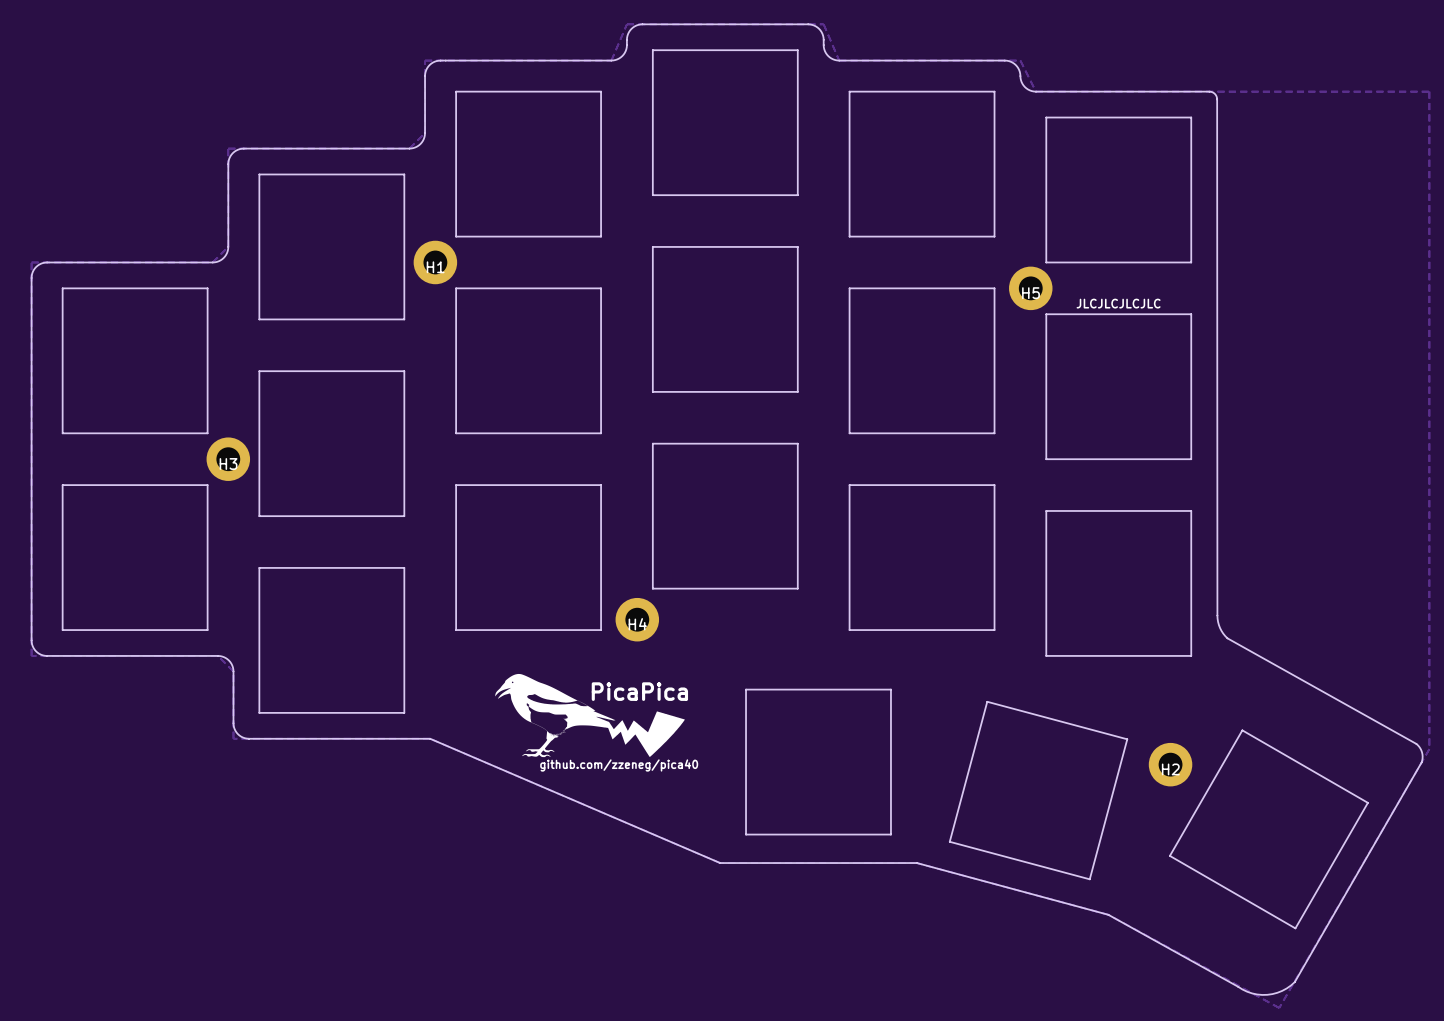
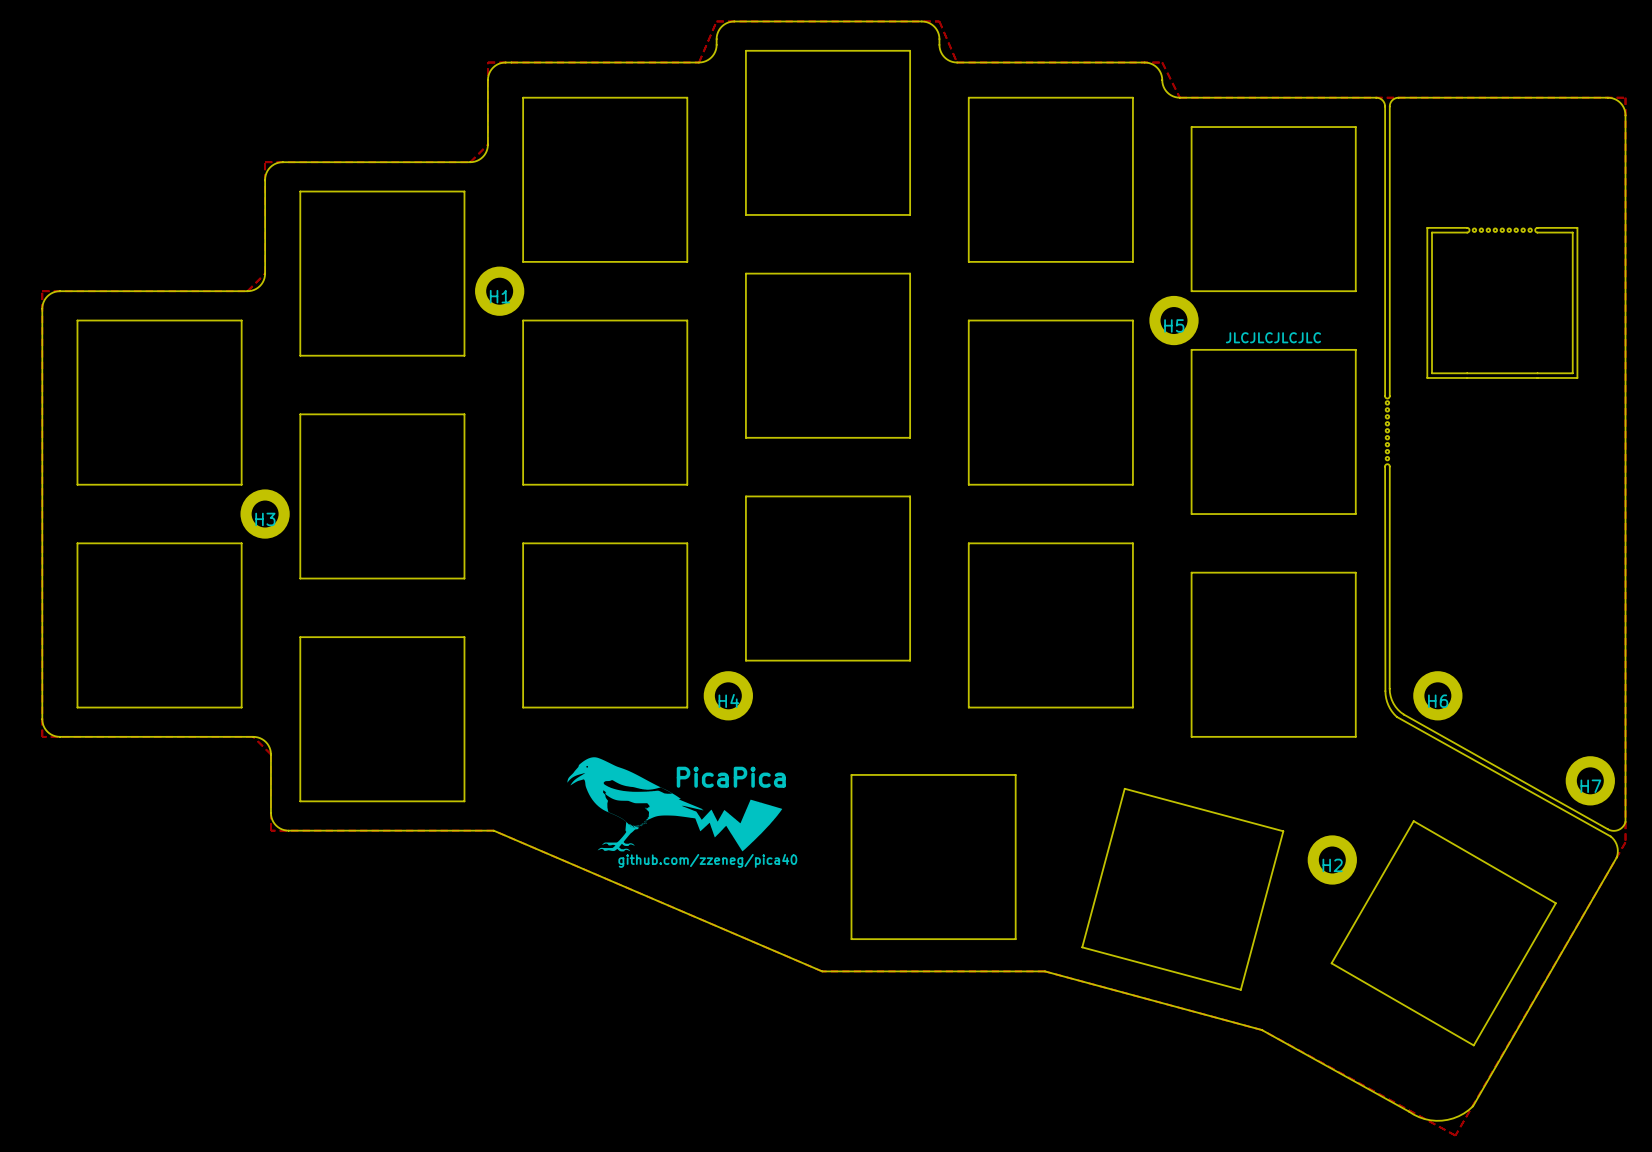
board edge: (1217, 99) (1217, 615) -> (1385, 106) (1385, 396) (1387, 398) (1389, 396) (1389, 106) (1391, 101) (1398, 97) (1607, 97) (1618, 101) (1624, 110) (1624, 824) (1617, 830) (1607, 829) (1403, 714) (1395, 706) (1389, 688) (1389, 466) (1387, 464) (1385, 466) (1385, 691)
part: none -> (1502, 302)
part: none -> (1387, 430)
H6: none -> (1437, 695)
H7: none -> (1590, 780)

